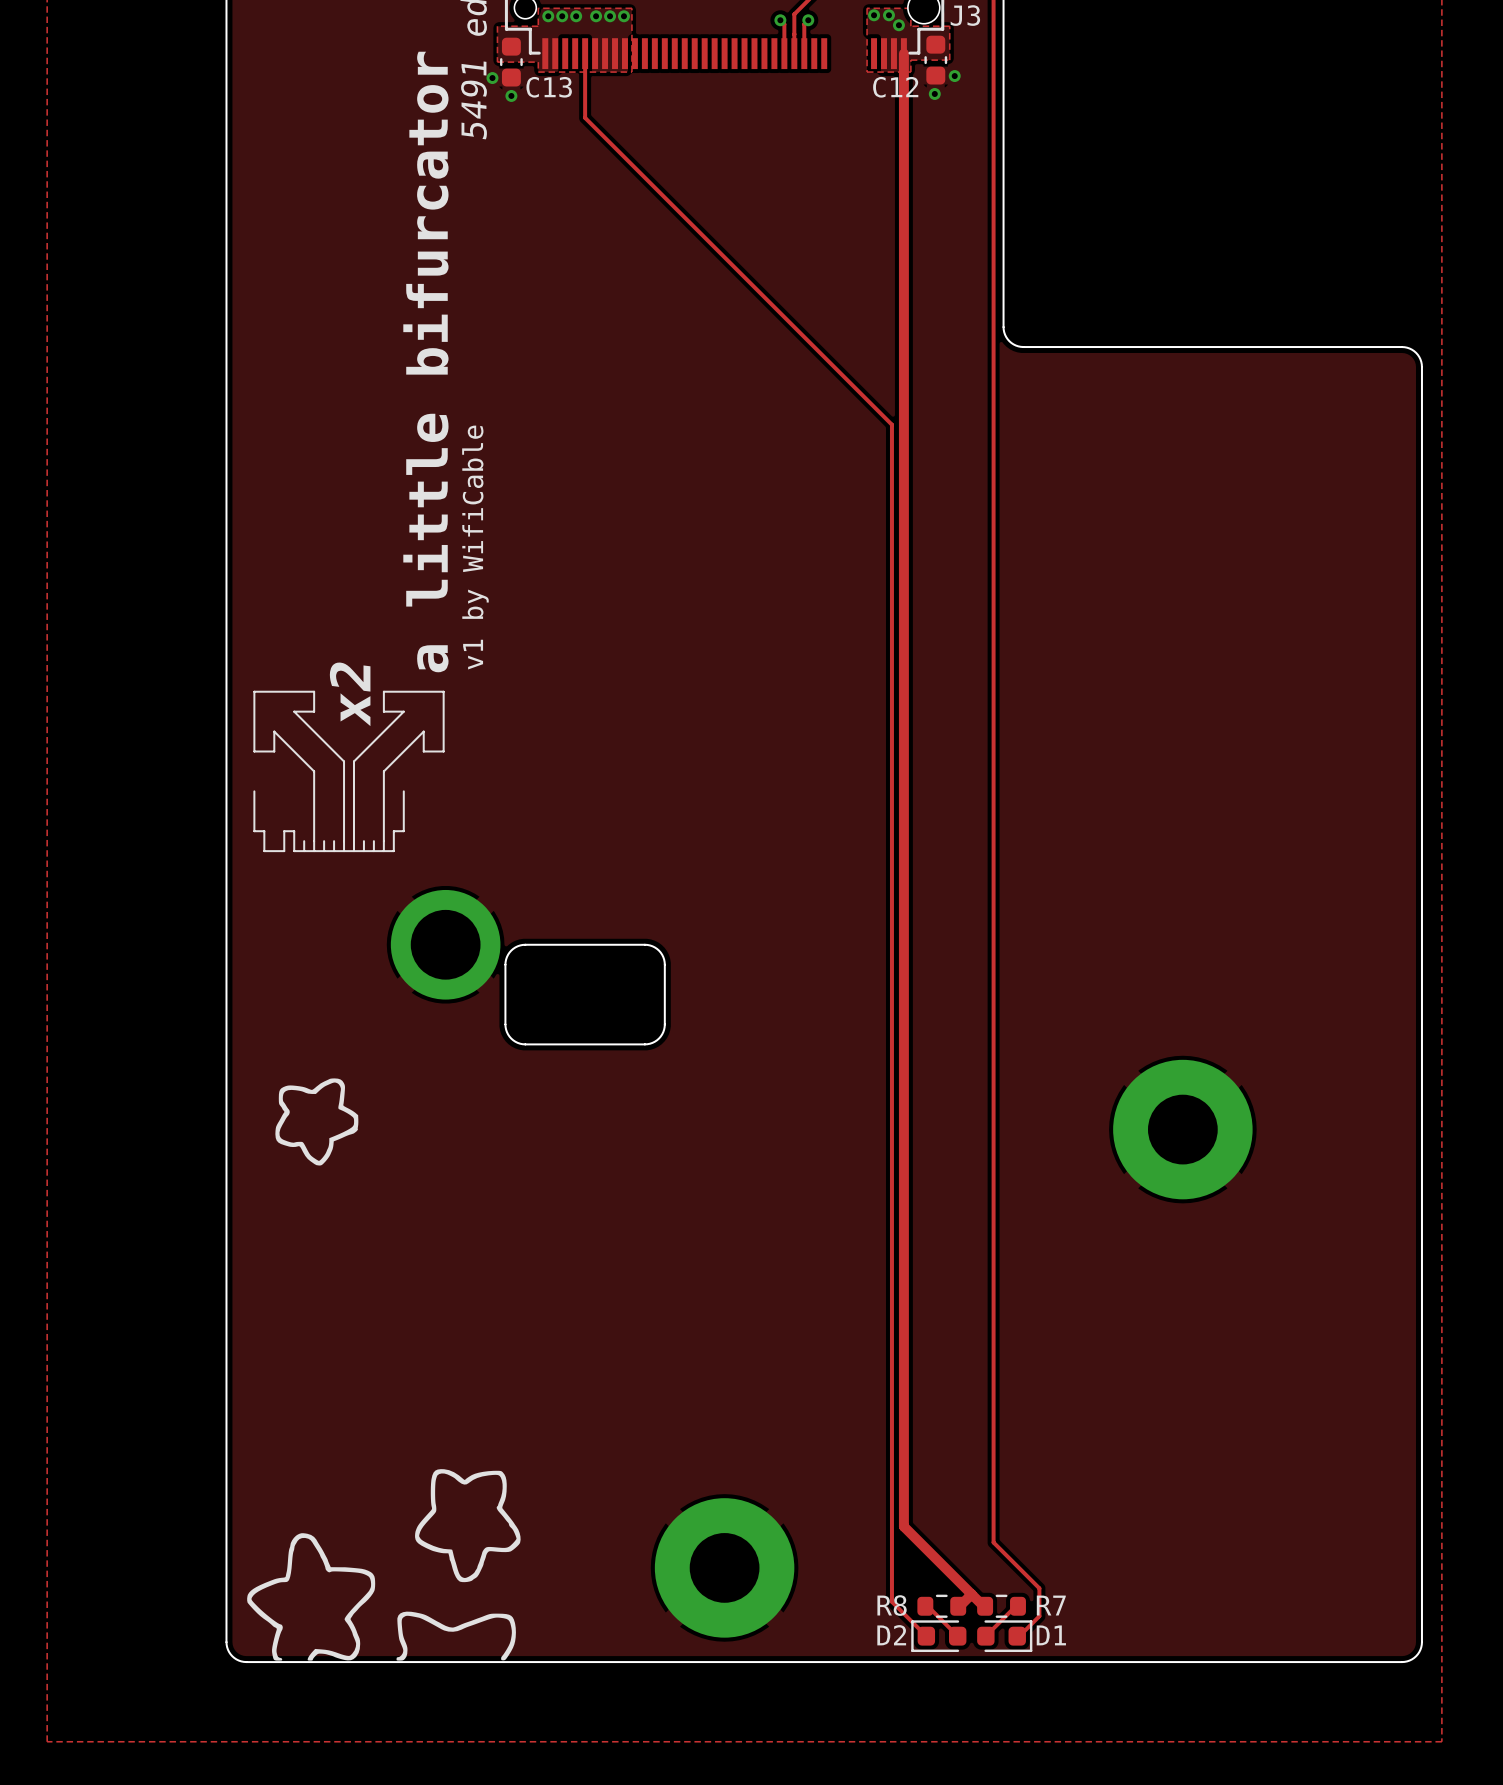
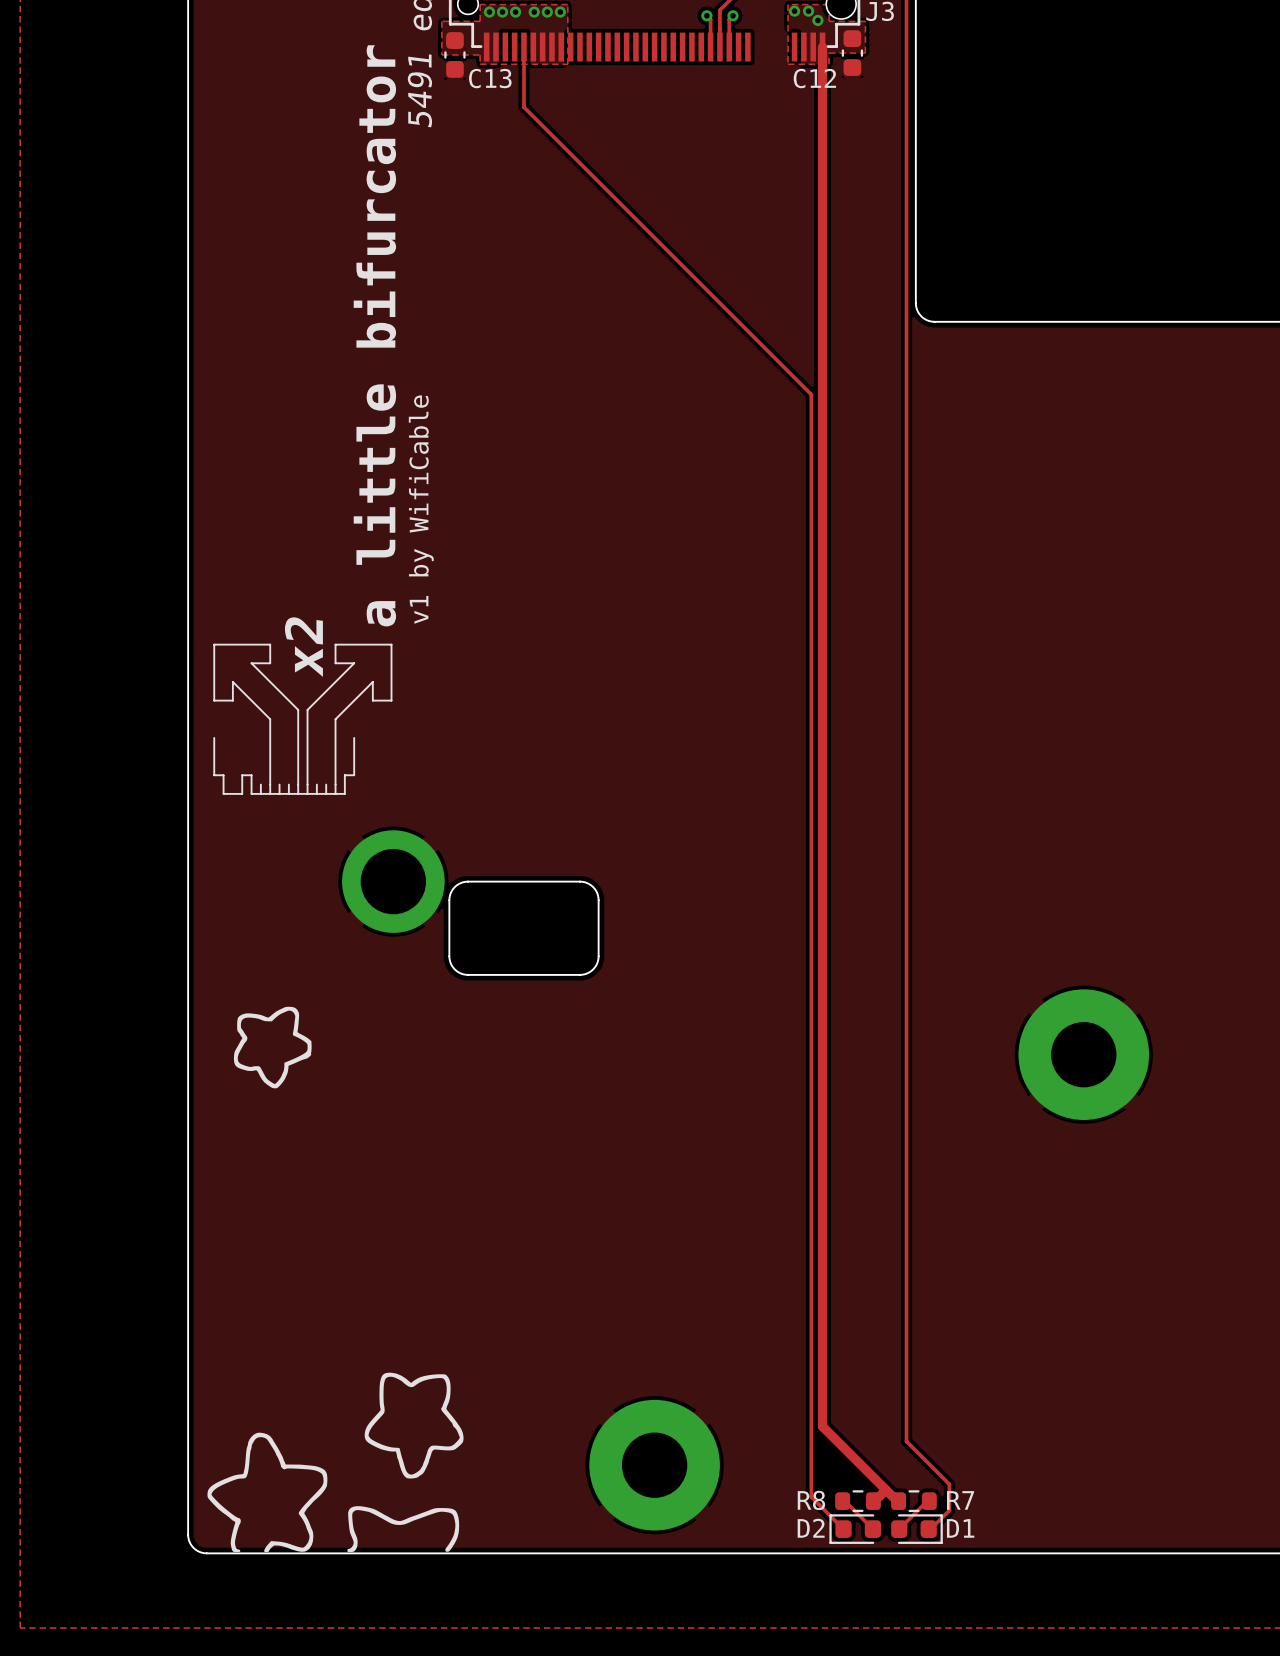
via: (954, 76) -> none
via: (492, 78) -> none
via: (934, 93) -> none
via: (511, 95) -> none

